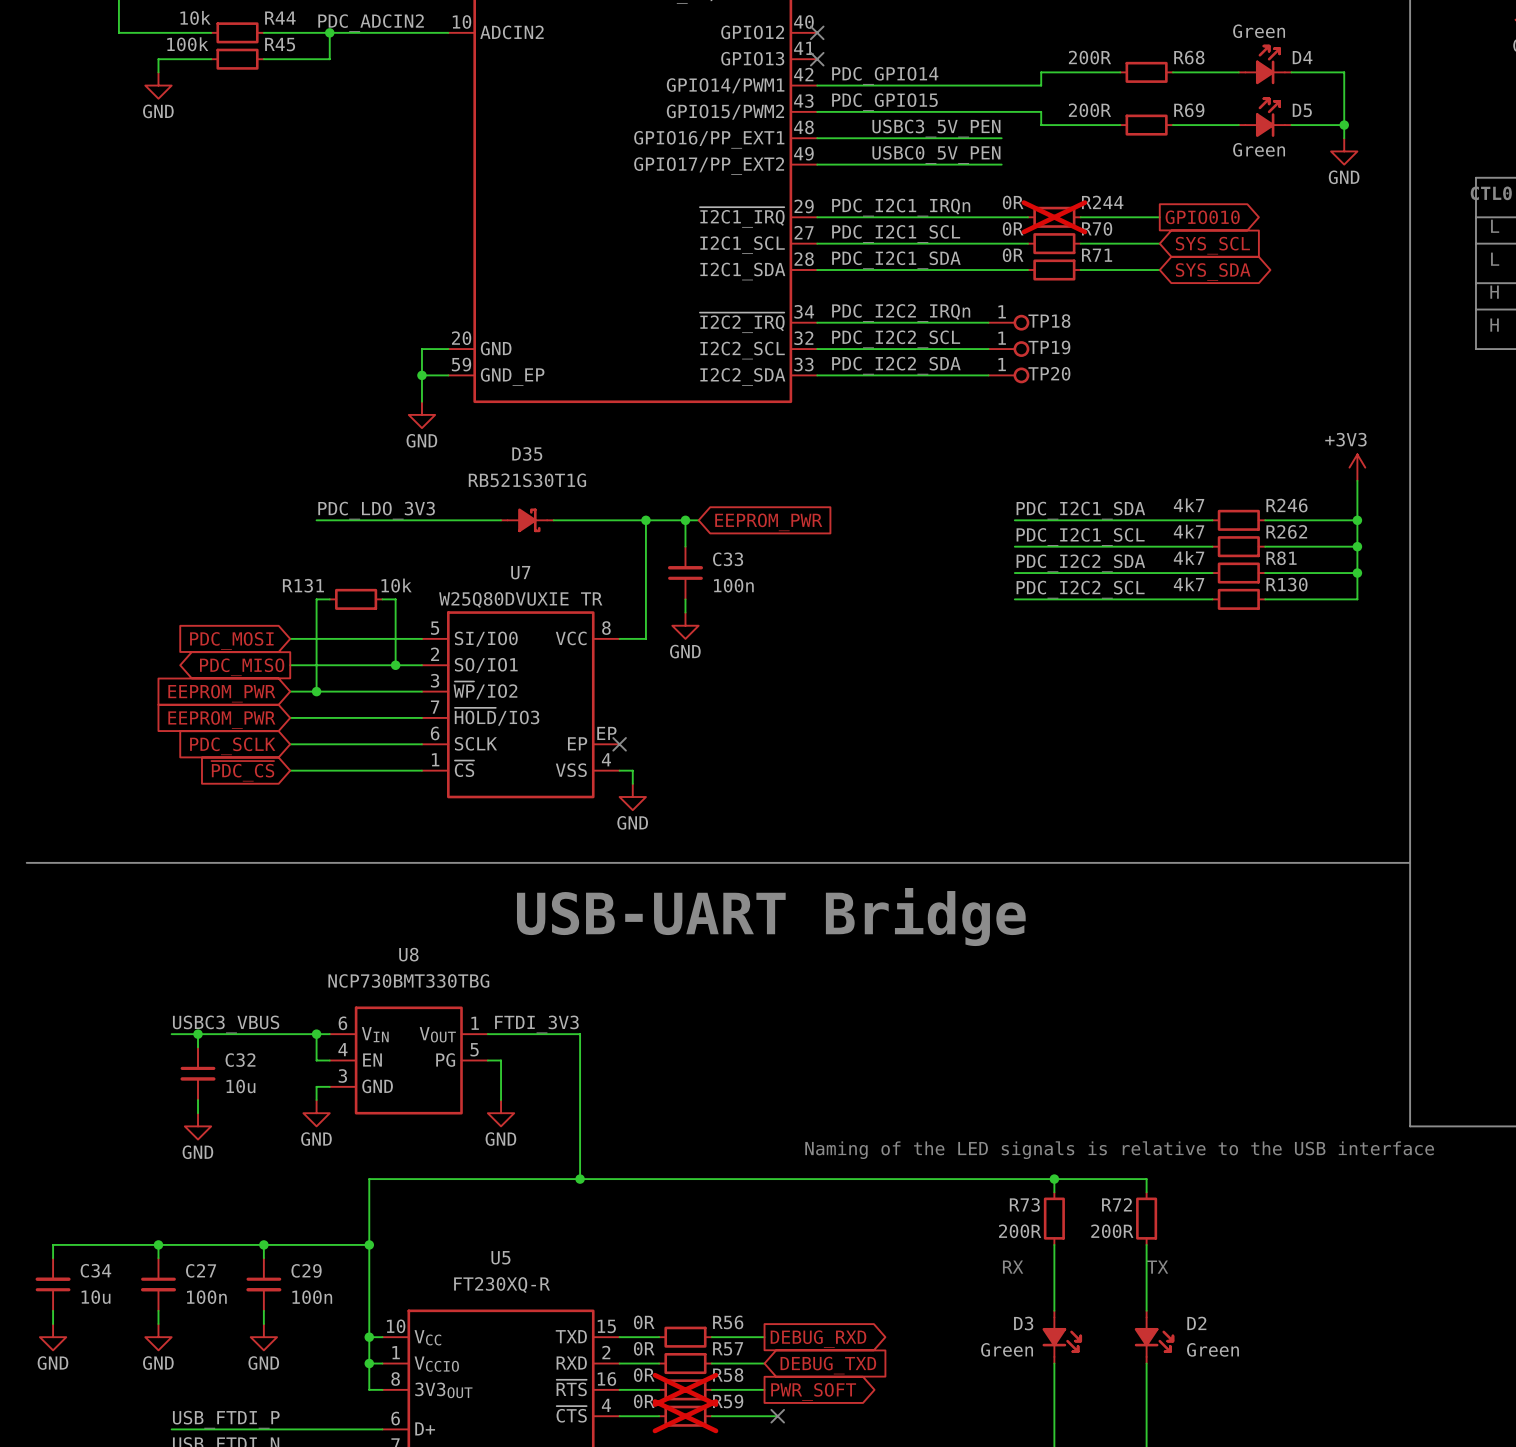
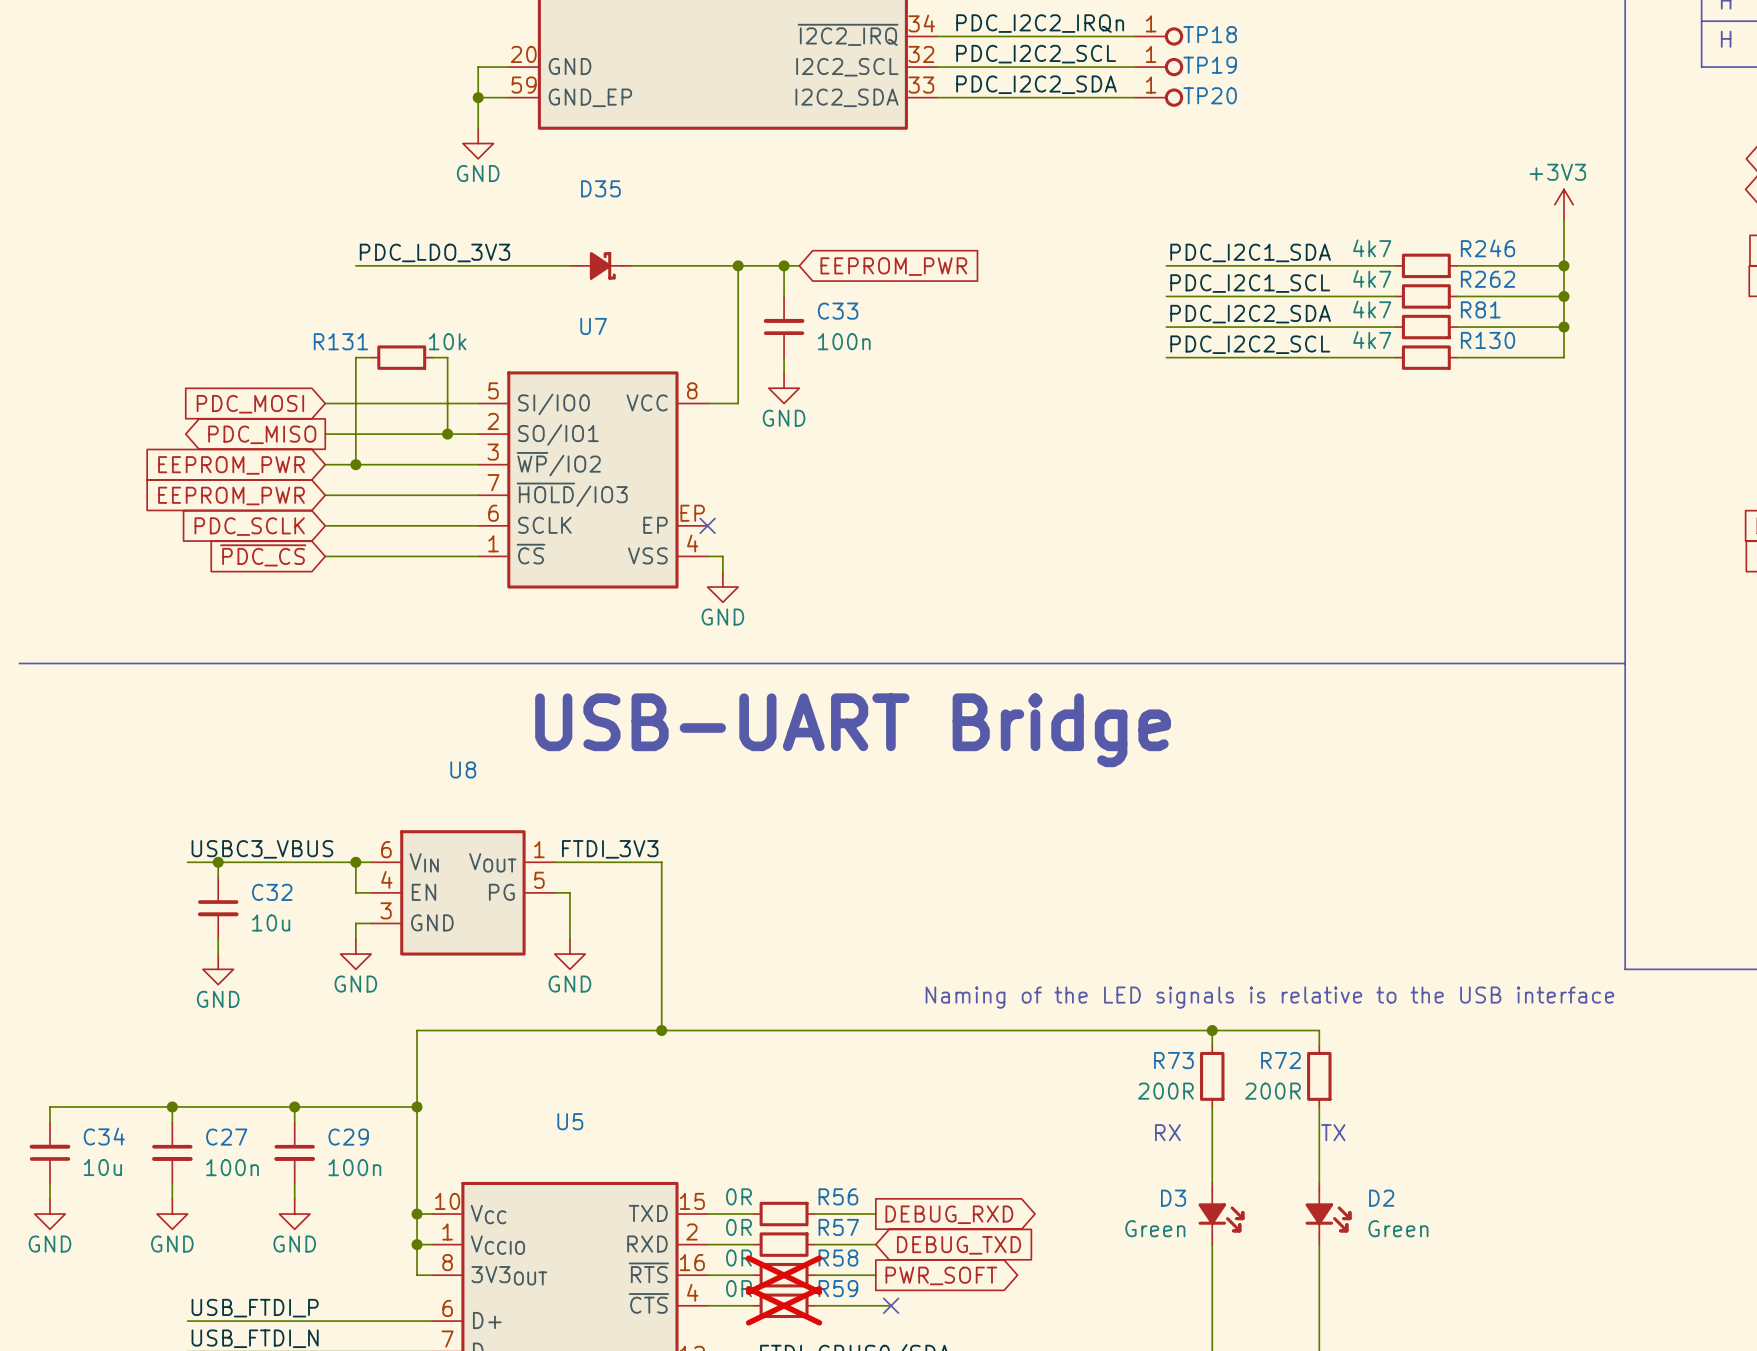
D35 text: RB521S30T1G (527, 480) -> none
U7 text: W25Q80DVUXIE TR (520, 599) -> none
U8 text: NCP730BMT330TBG (408, 980) -> none
U5 text: FT230XQ-R (502, 1285) -> none

